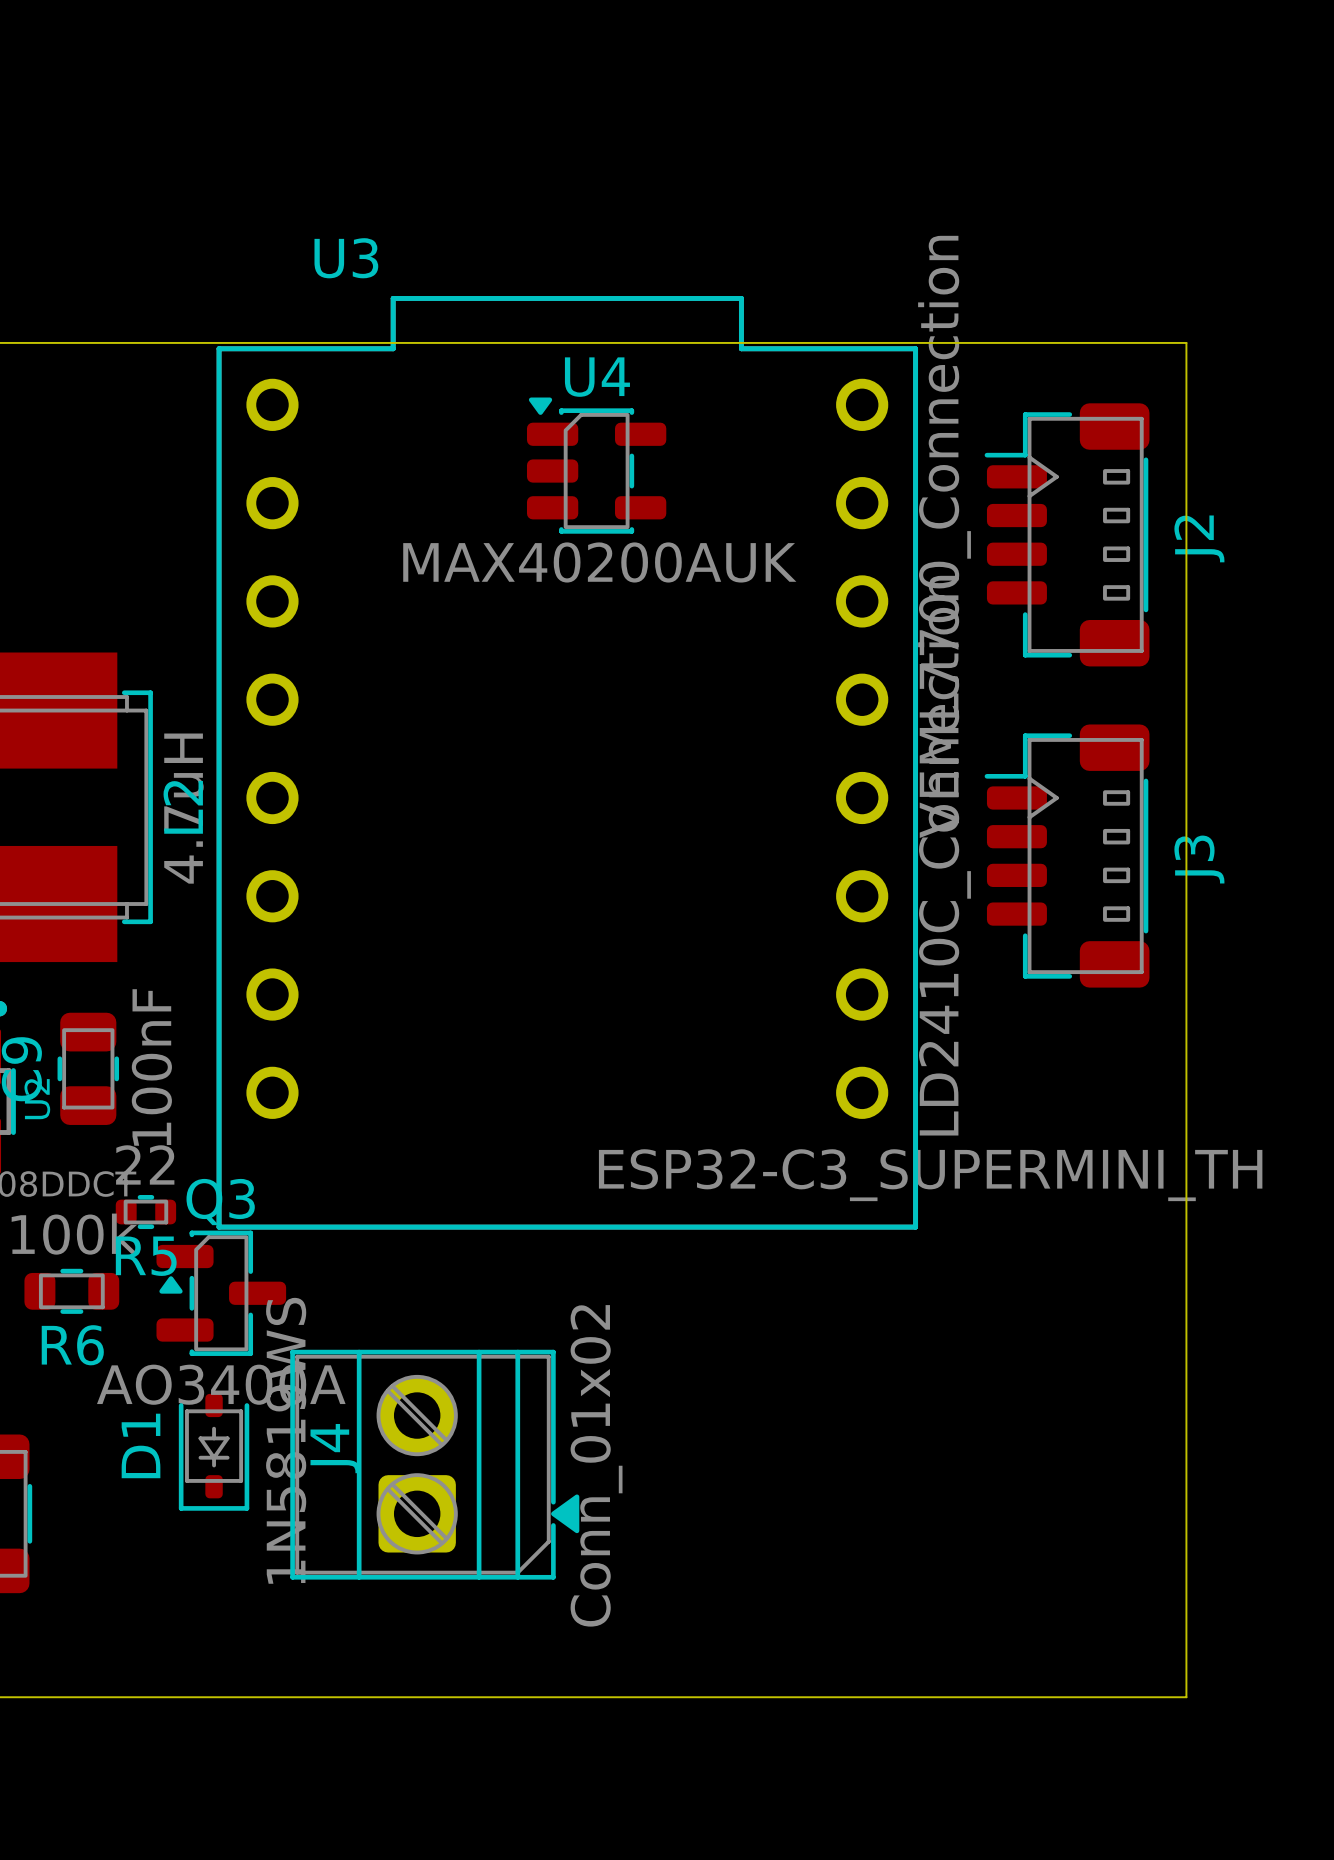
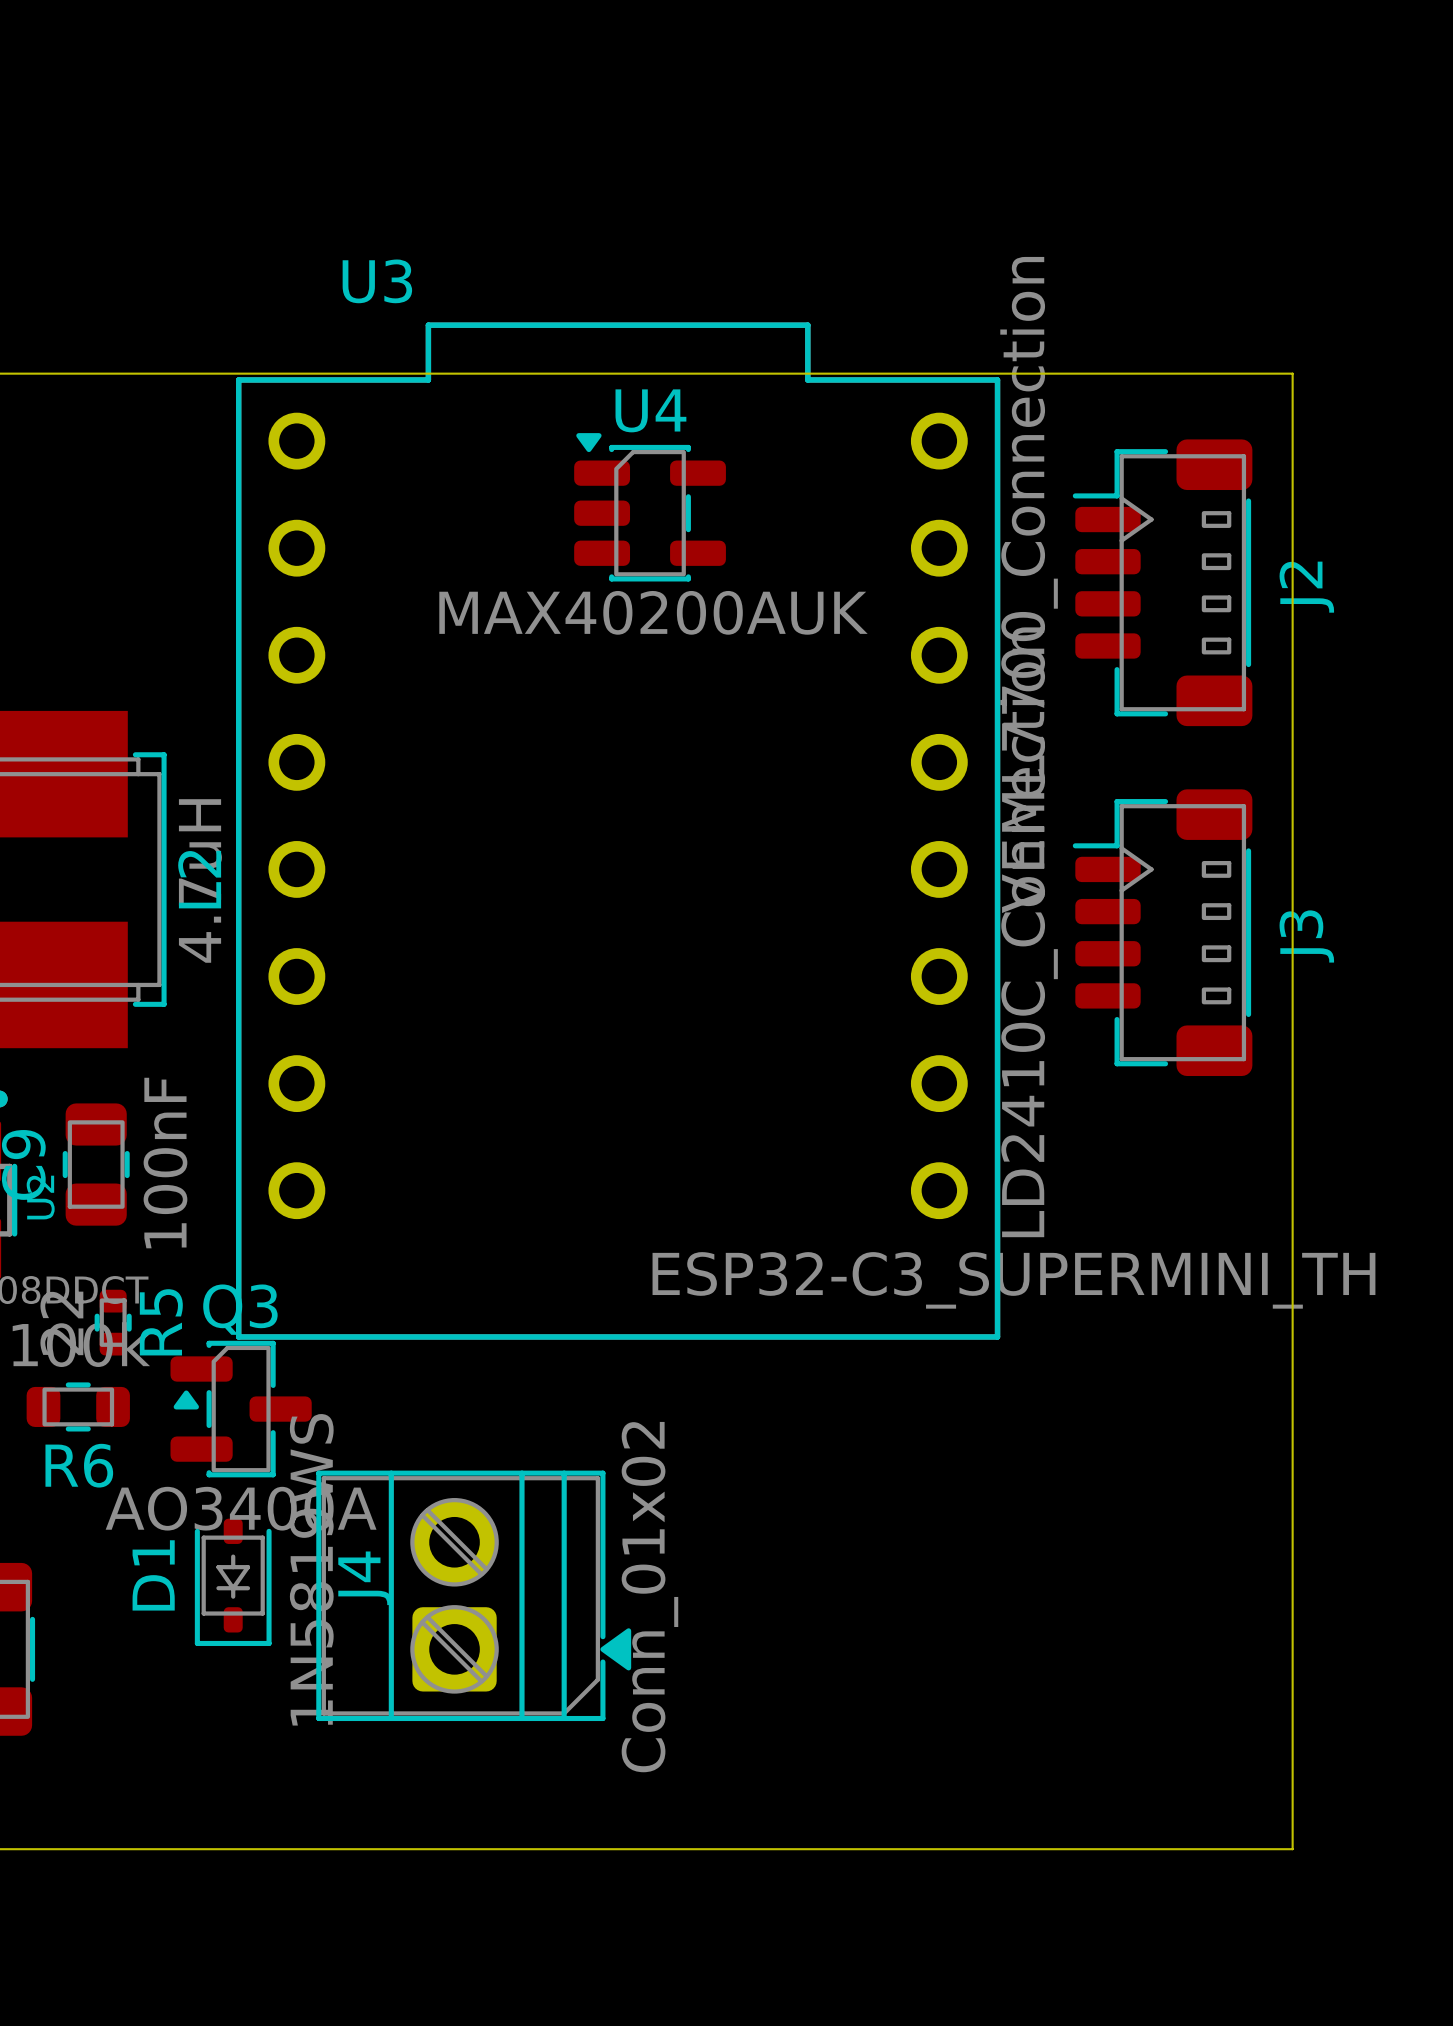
R5 rotation: 0° (145, 1212) -> 90° clockwise (113, 1322)
R5 position: (145, 1212) -> (113, 1322)

